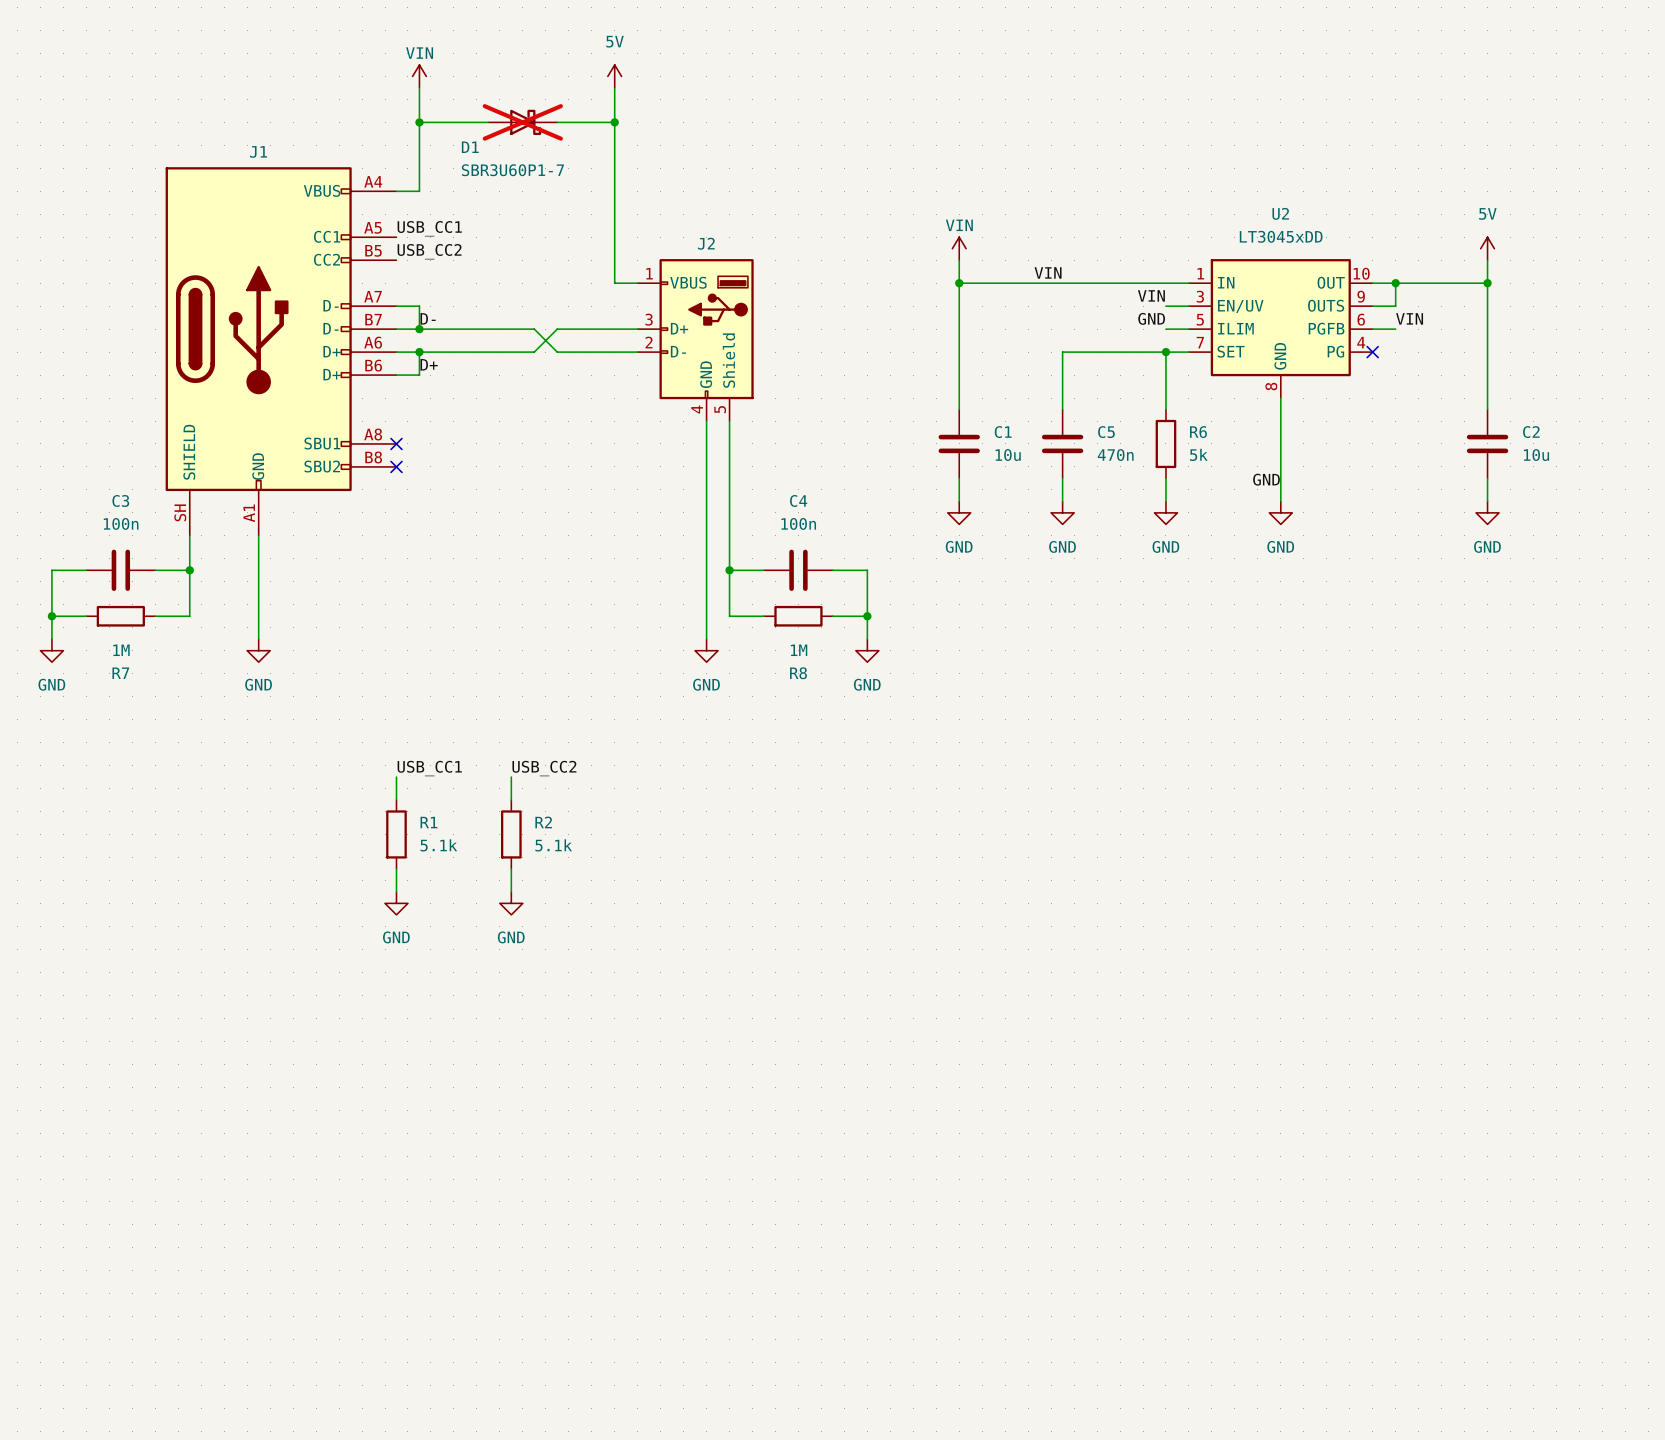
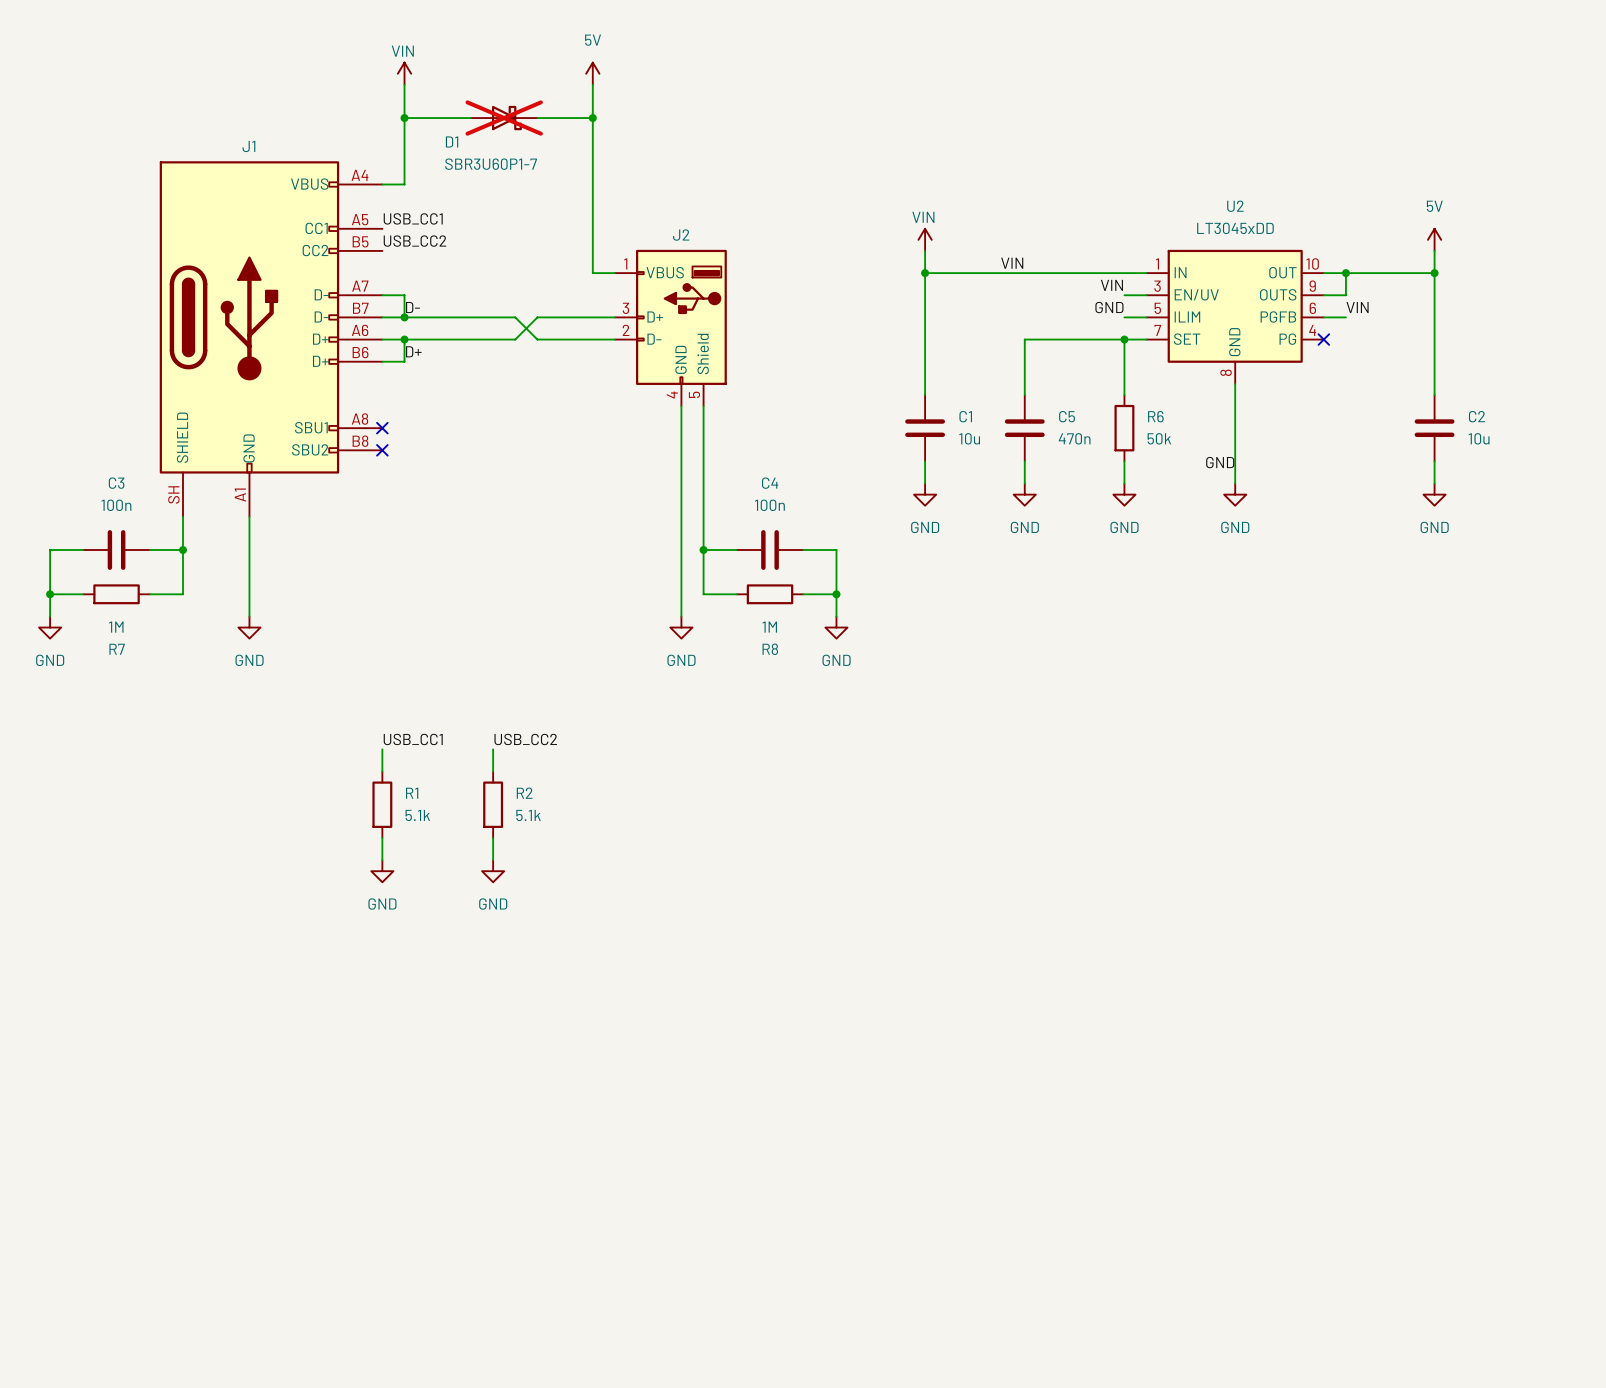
R6 value: 5k (1198, 454) -> 50k (1159, 438)

